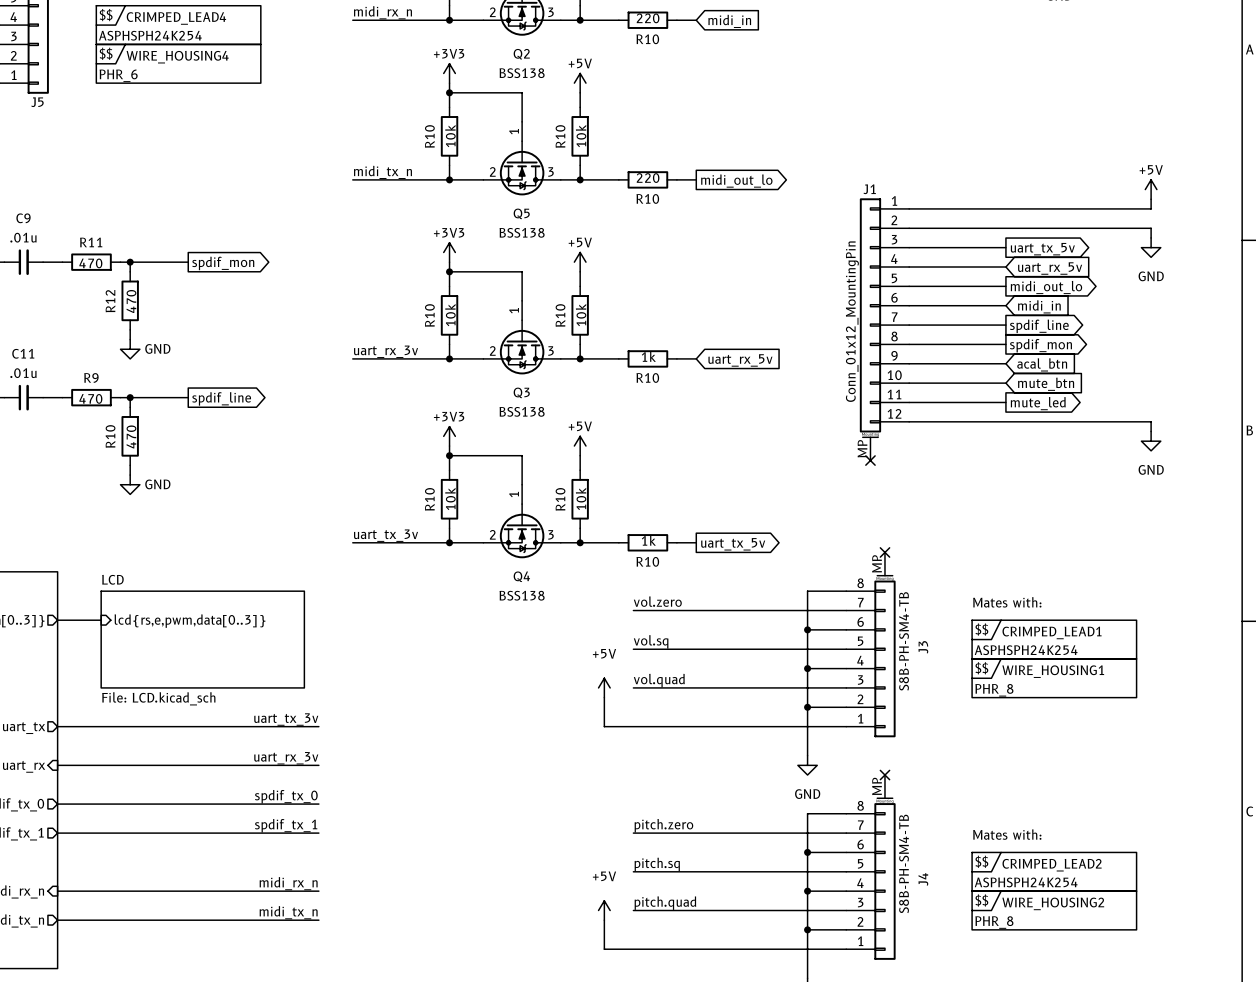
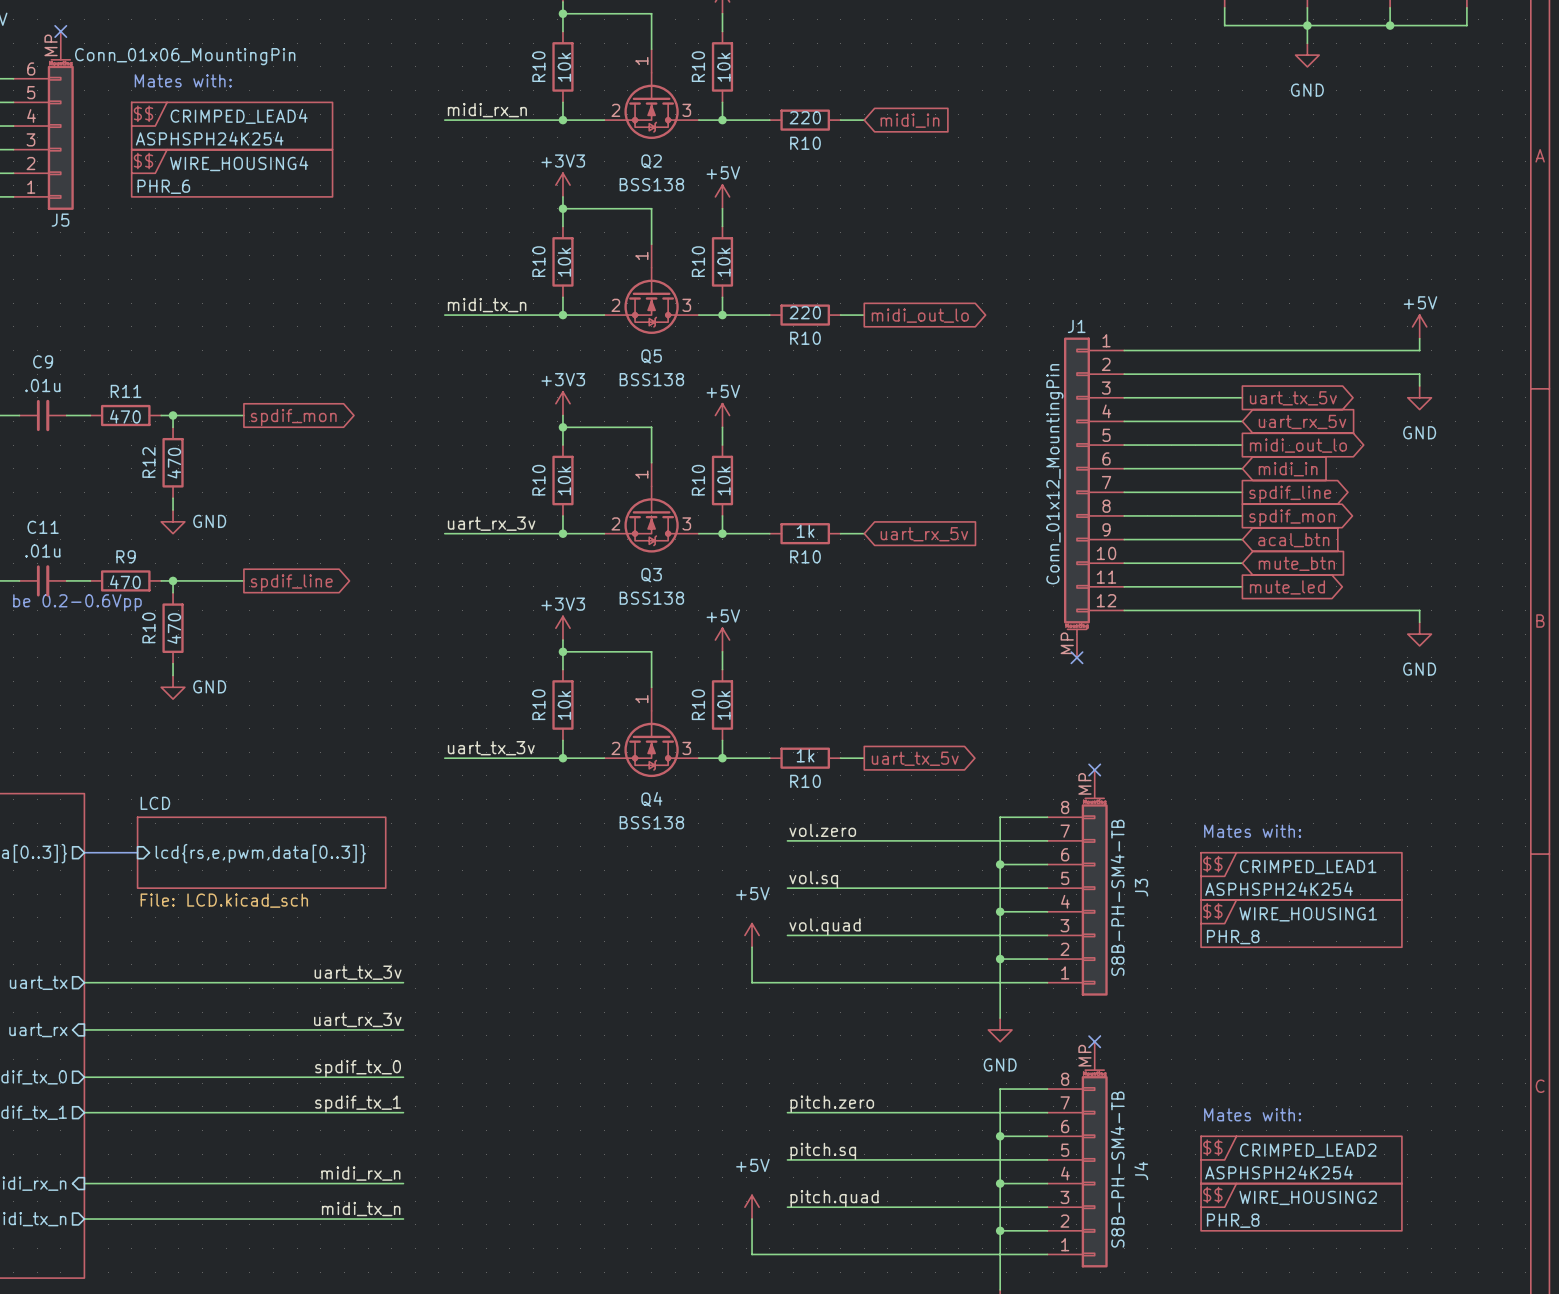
sheet LCD: none -> File: LCD.kicad_sch (261, 852)
sheet LCD: File: LCD.kicad_sch (202, 639) -> none

